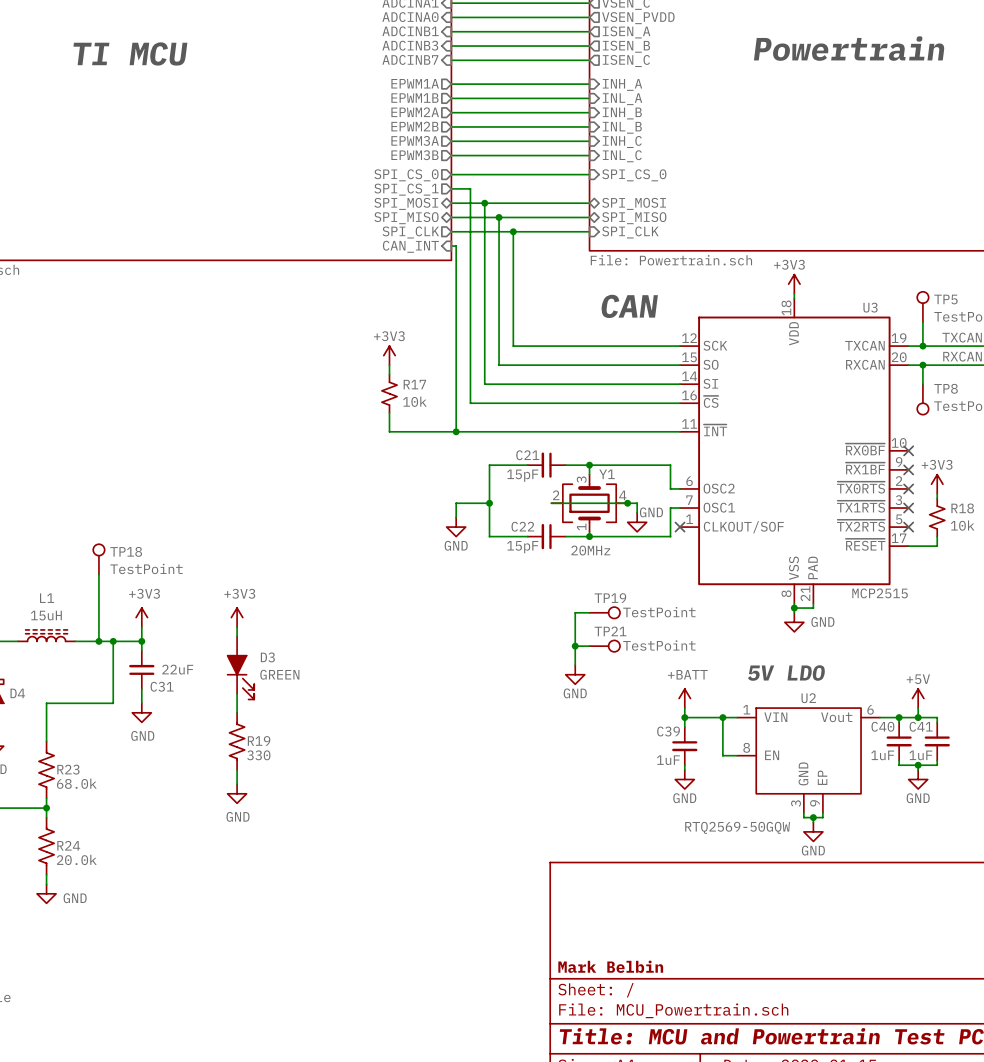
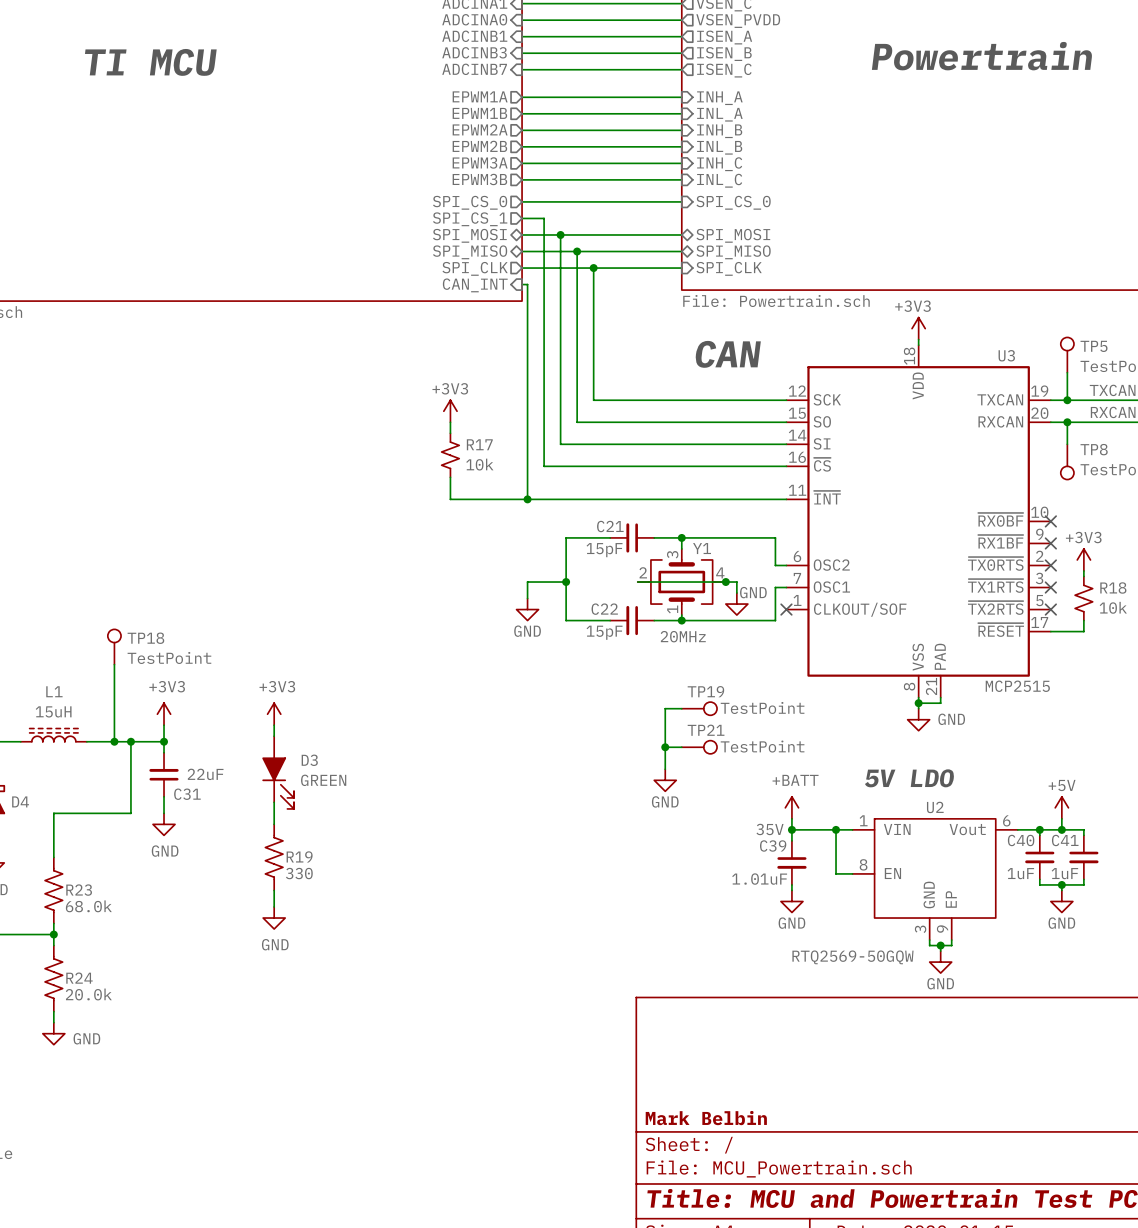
C39 text: none -> 35V (770, 829)
C39 value: 1uF (668, 760) -> 1.01uF (759, 879)

